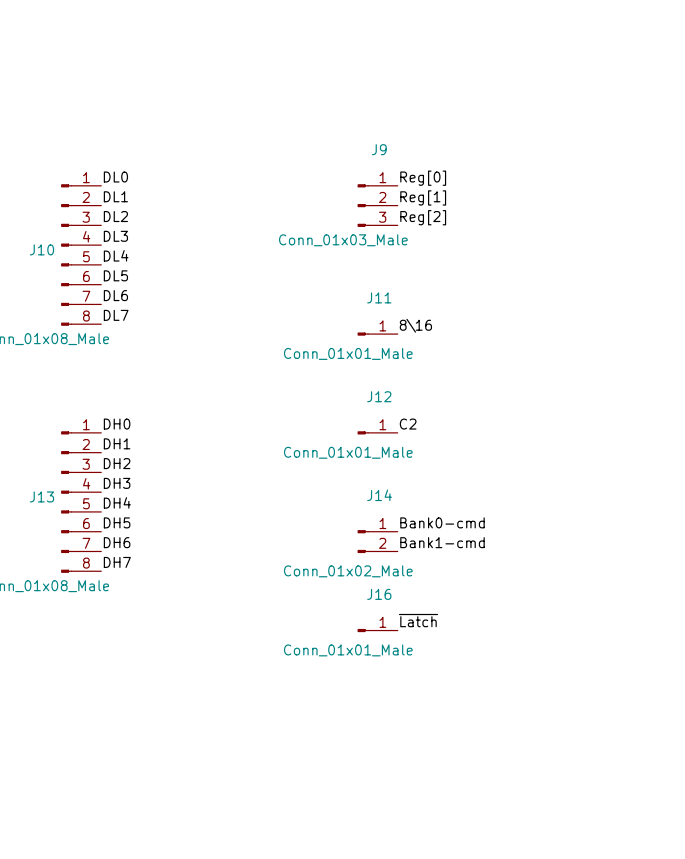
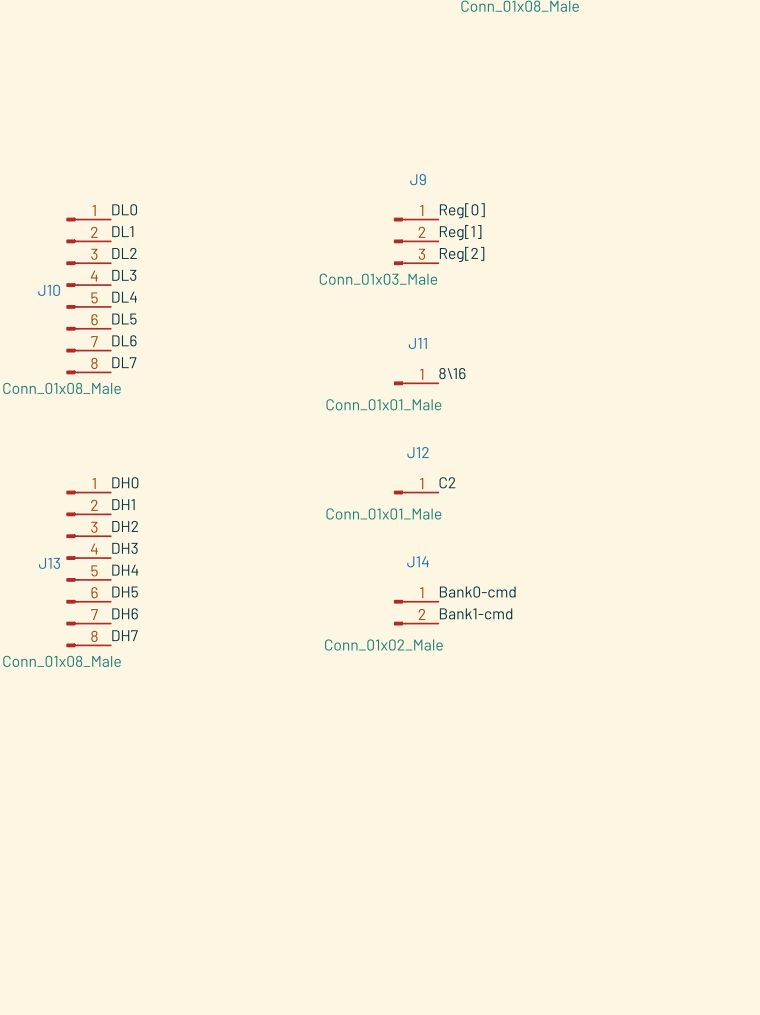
label: ~{Latch} (418, 620) -> none
J16: Conn_01x01_Male (377, 630) -> none

